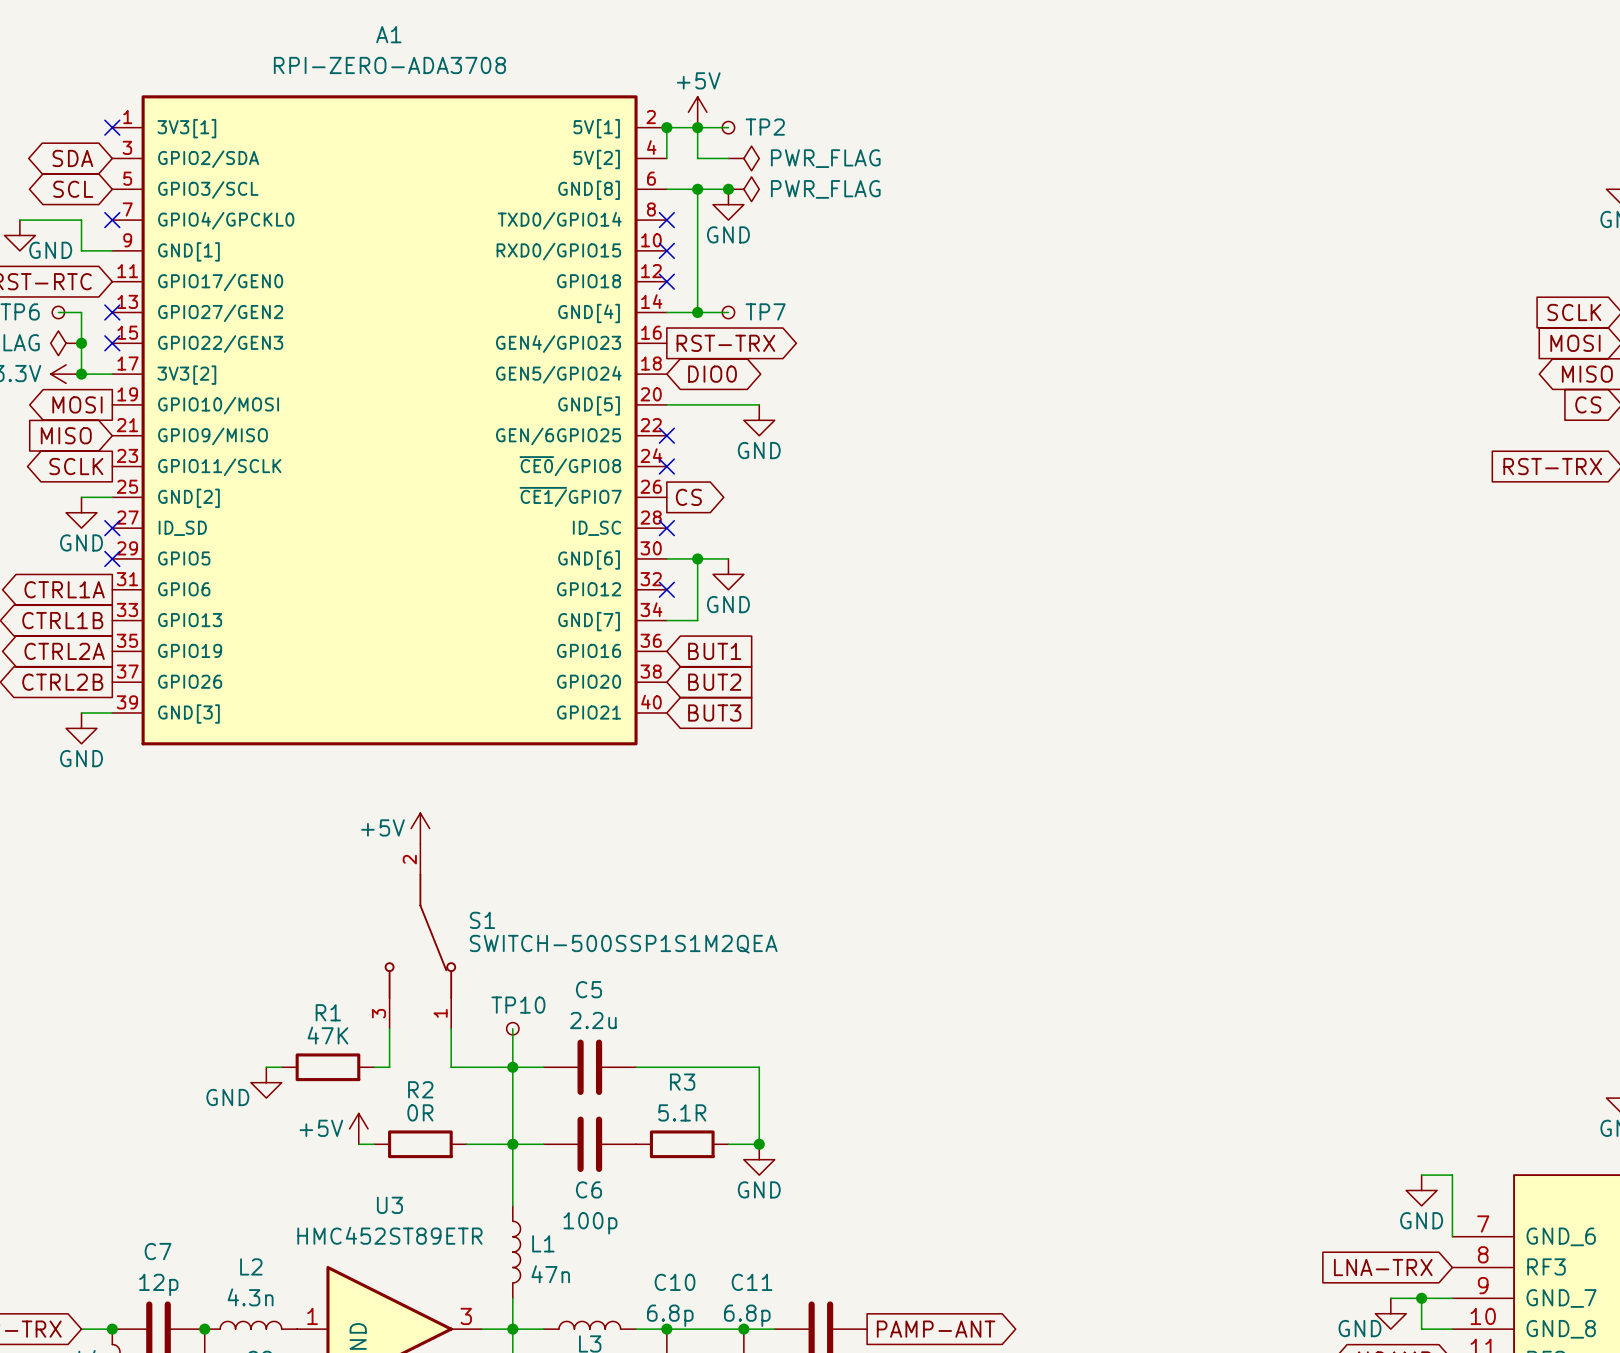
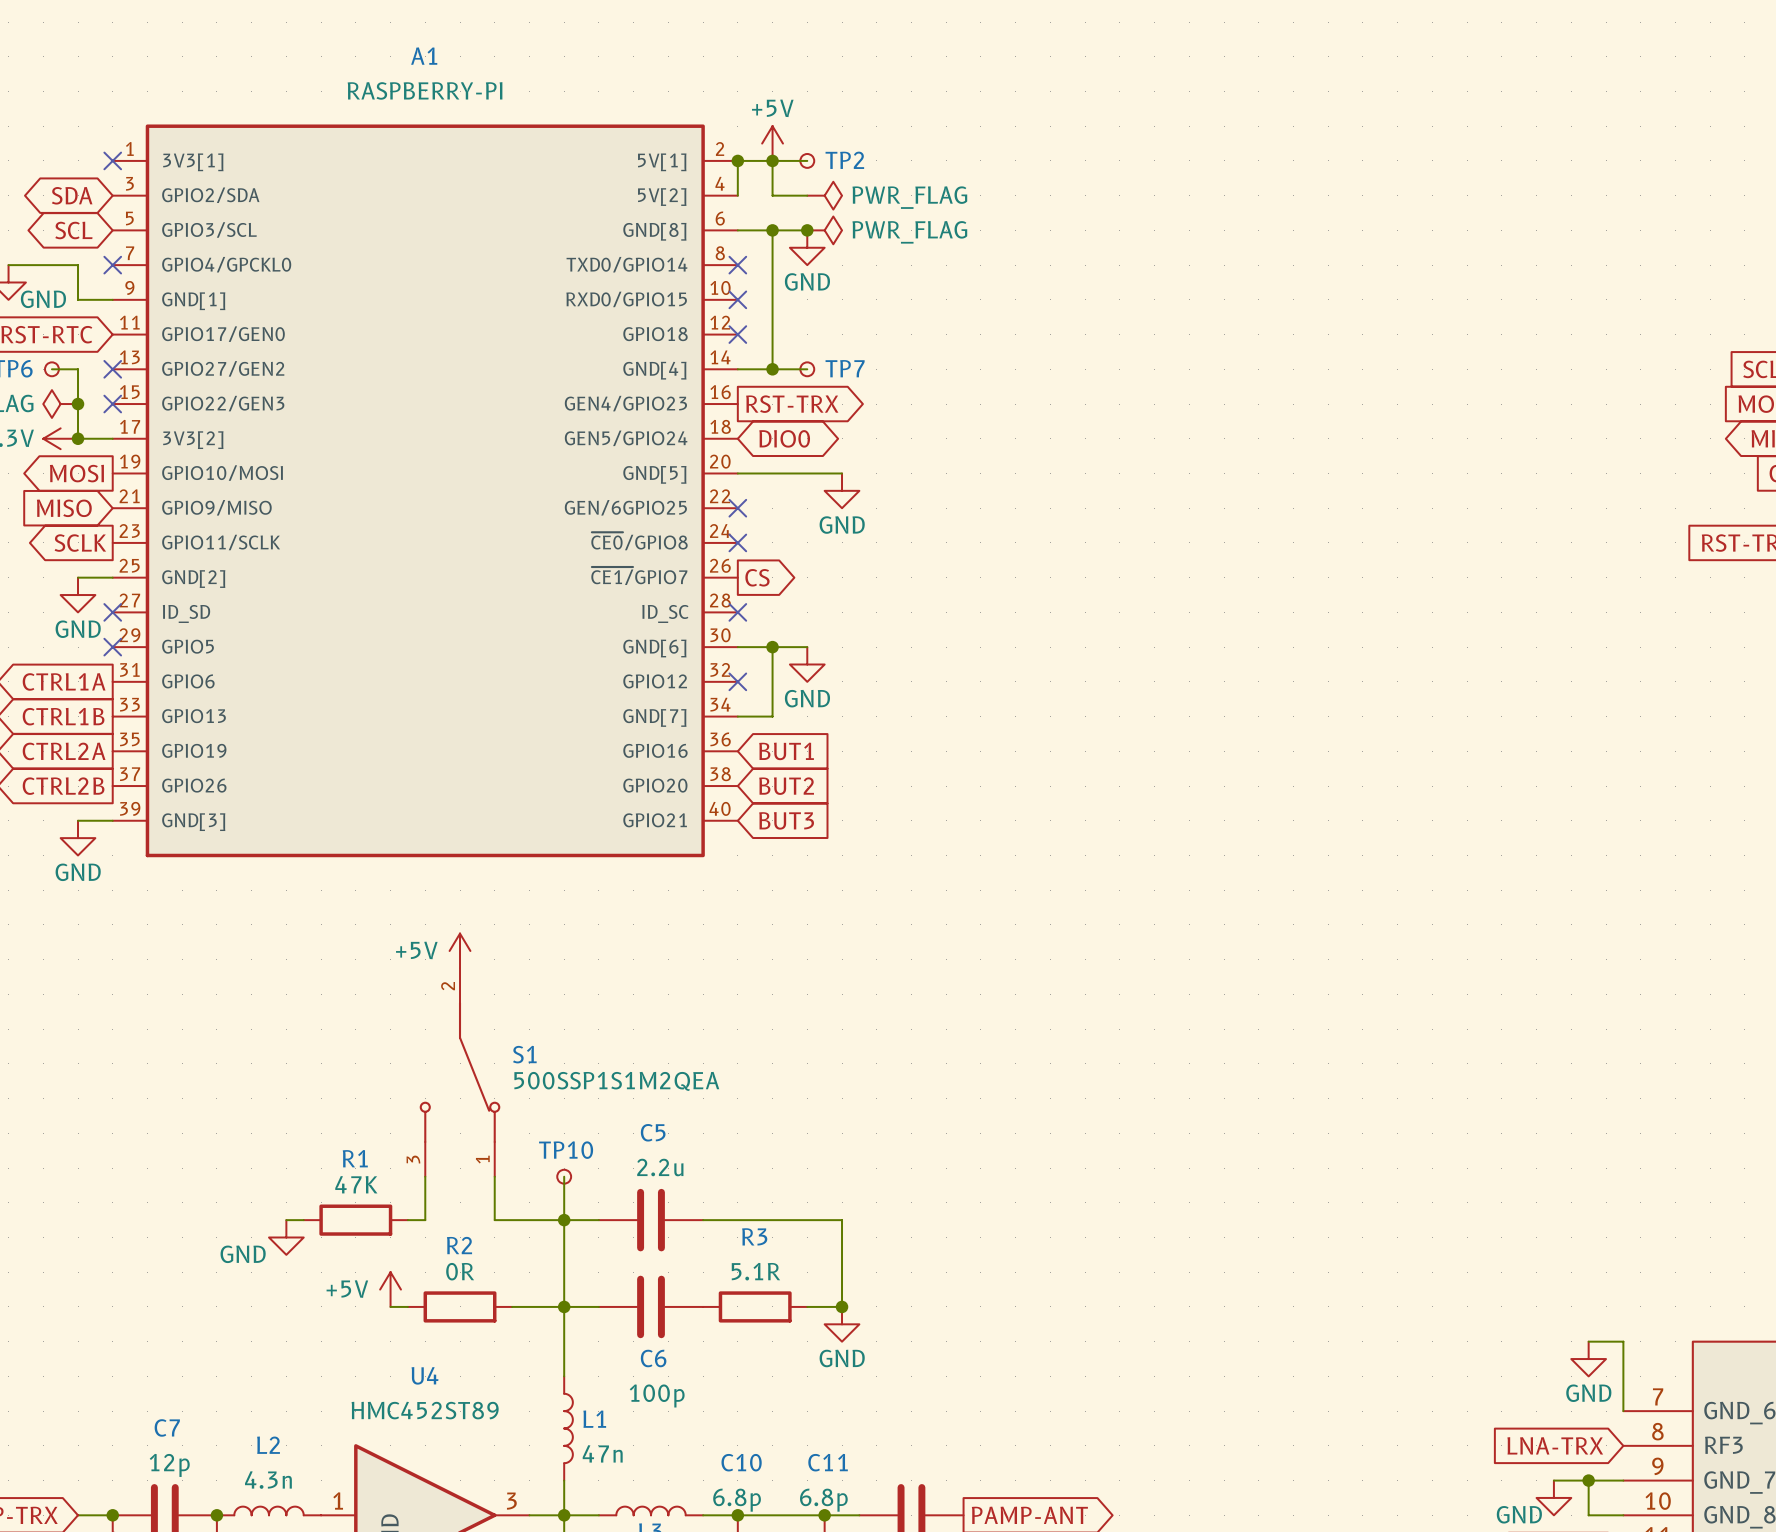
A1 value: RPI-ZERO-ADA3708 (389, 65) -> RASPBERRY-PI (425, 90)
S1 value: SWITCH-500SSP1S1M2QEA (623, 944) -> 500SSP1S1M2QEA (616, 1081)
U3 name: U3 (389, 1205) -> U4 (424, 1375)
U3 value: HMC452ST89ETR (389, 1235) -> HMC452ST89 (425, 1410)

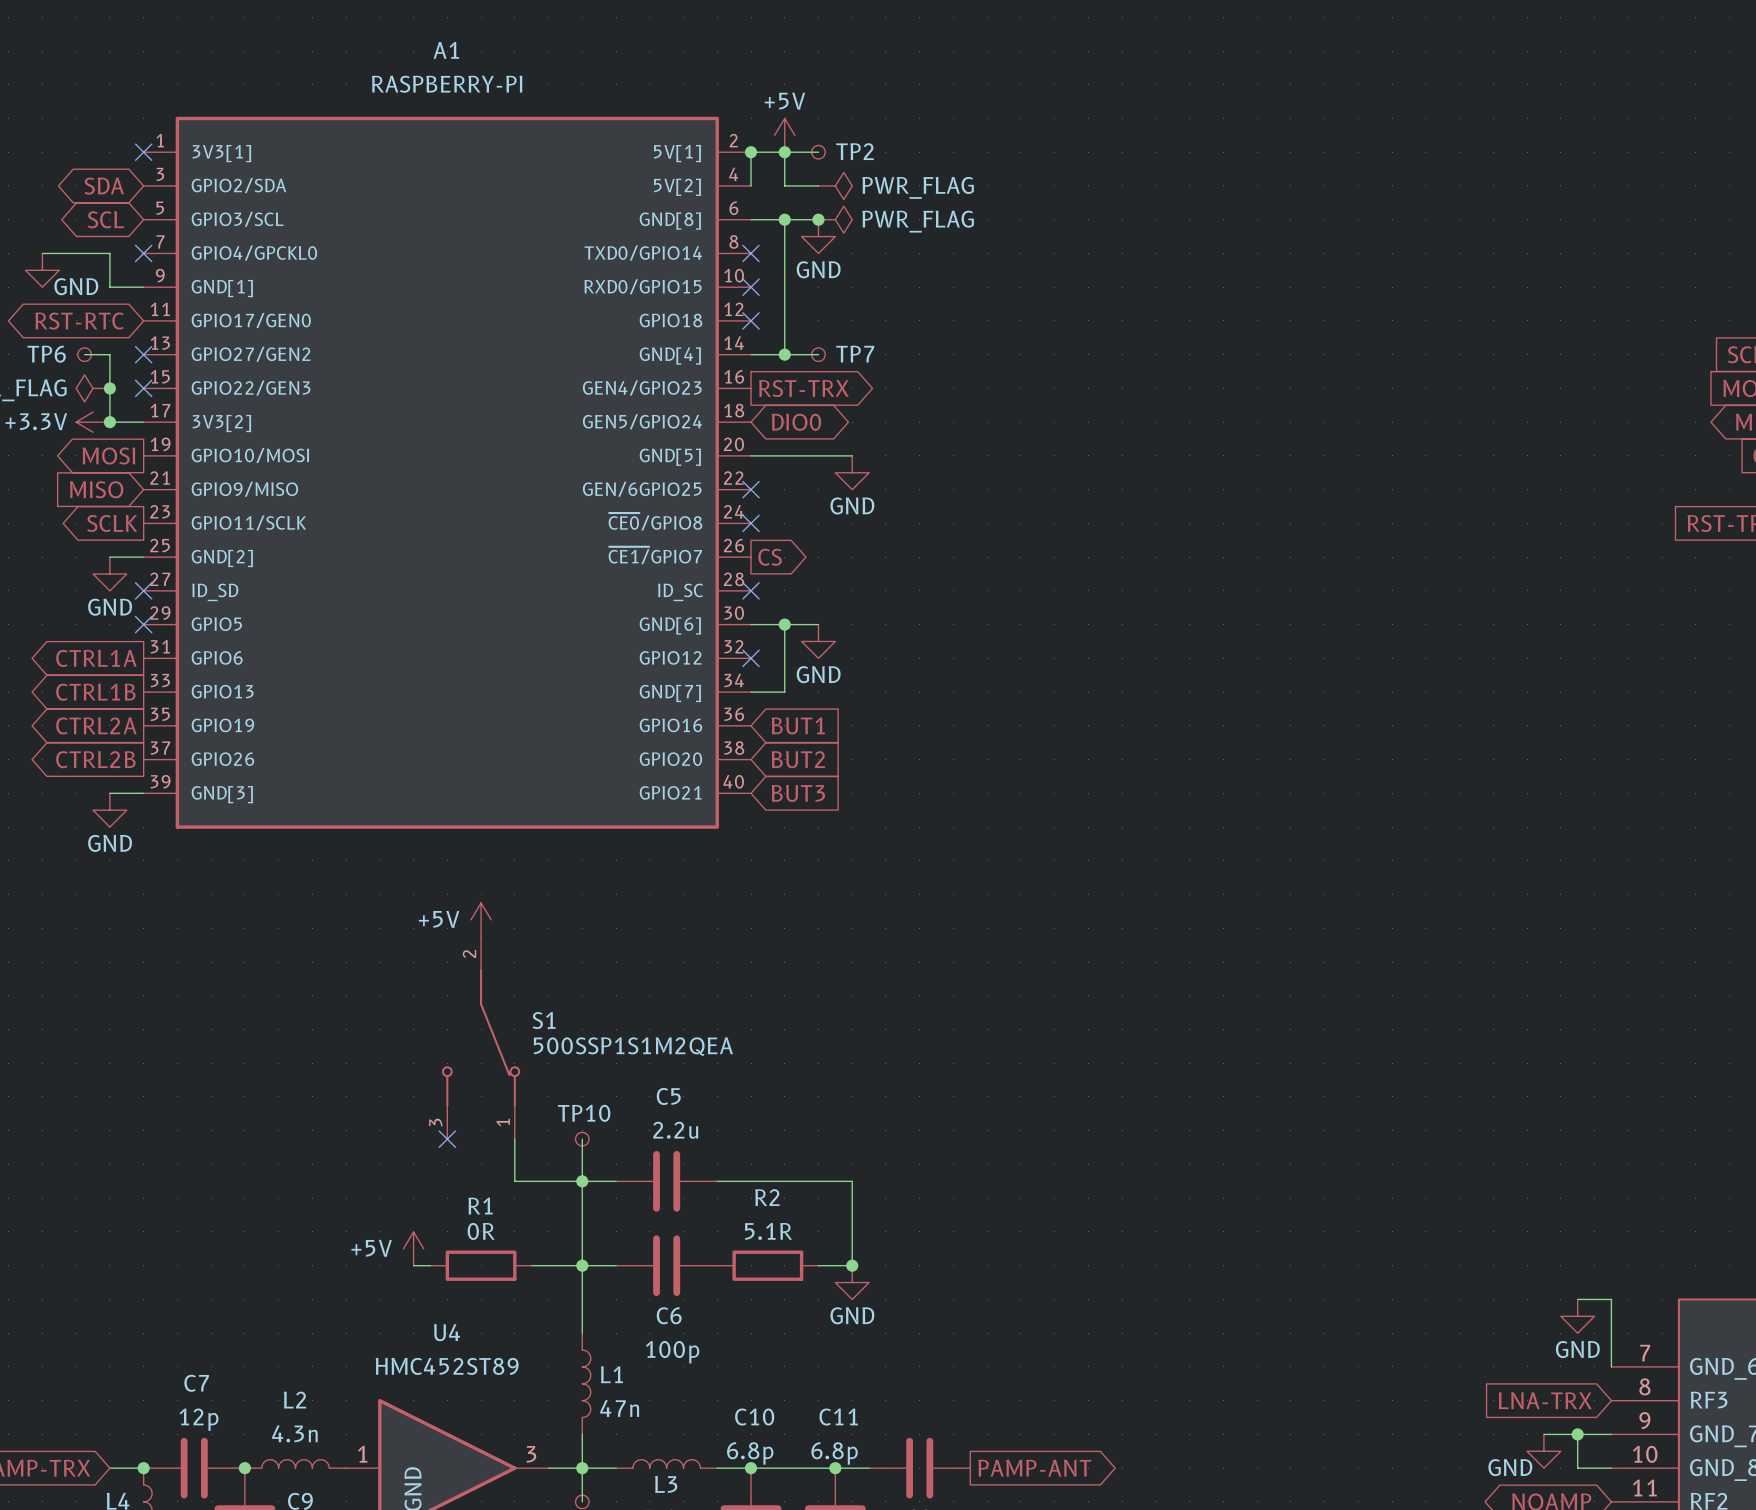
wire: (425, 1176) (425, 1220) (407, 1220) -> none
no-connect mark: none -> (447, 1139)
wire: (286, 1220) (303, 1220) -> none
R1: 47K (355, 1220) -> none
R3 name: R3 (754, 1236) -> R2 (767, 1197)
power symbol: GND (286, 1237) -> none
R2 name: R2 (459, 1245) -> R1 (480, 1206)

